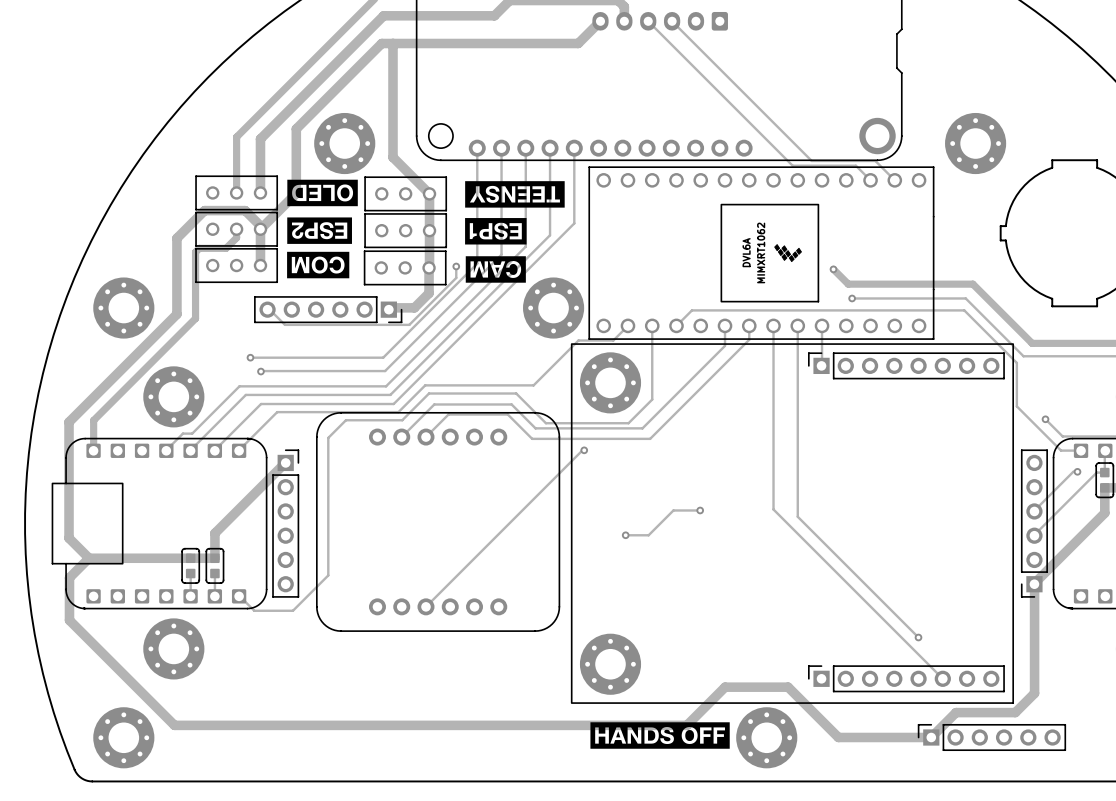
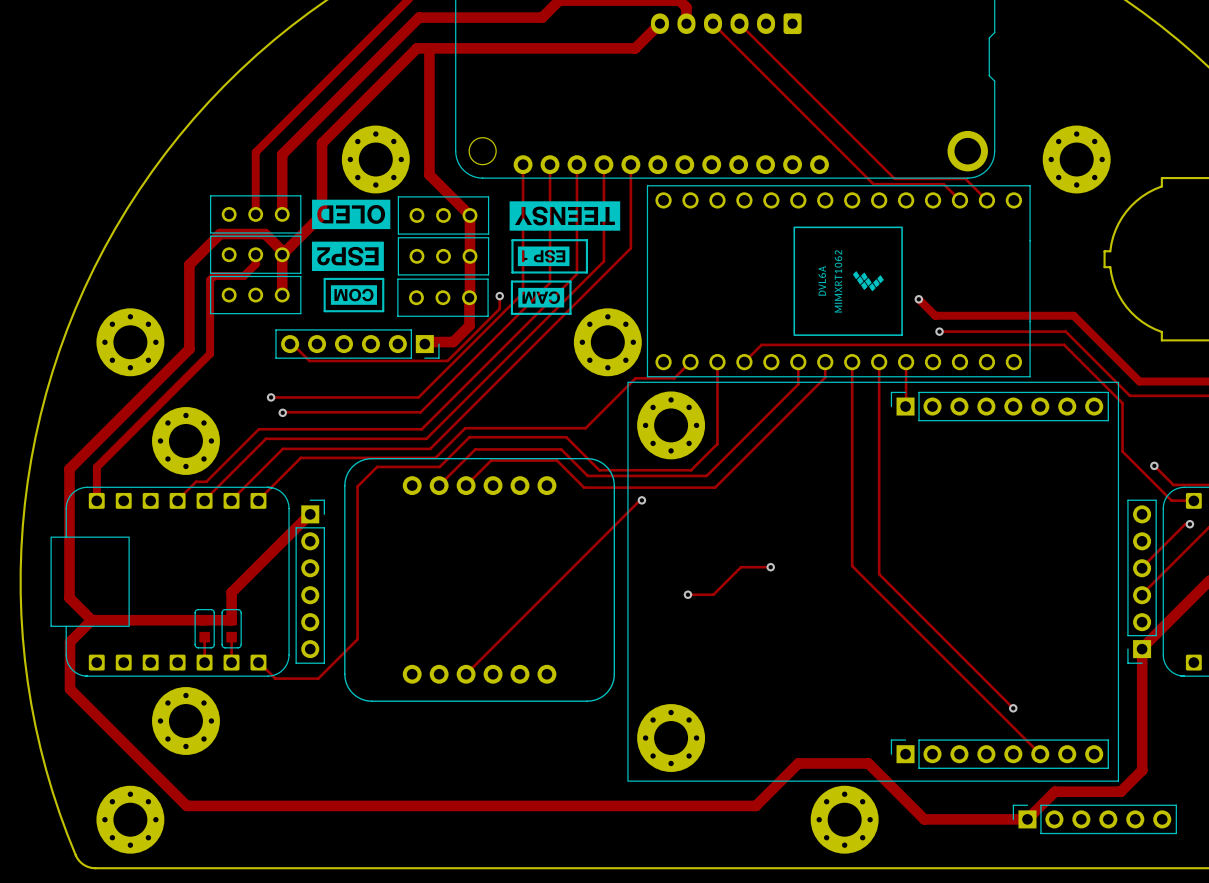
line: none -> (512, 240) (586, 240) (586, 272) (512, 272) (512, 240)
drawing shape: [465, 218, 527, 245] -> [517, 246, 570, 267]
drawing shape: [287, 251, 350, 279] -> [330, 285, 377, 305]
line: none -> (324, 278) (383, 278) (383, 311) (324, 311) (324, 278)
line: none -> (511, 281) (570, 281) (570, 313) (511, 313) (511, 281)
drawing shape: [465, 256, 526, 283] -> [518, 287, 565, 308]
drawing: [590, 722, 730, 749] -> none

